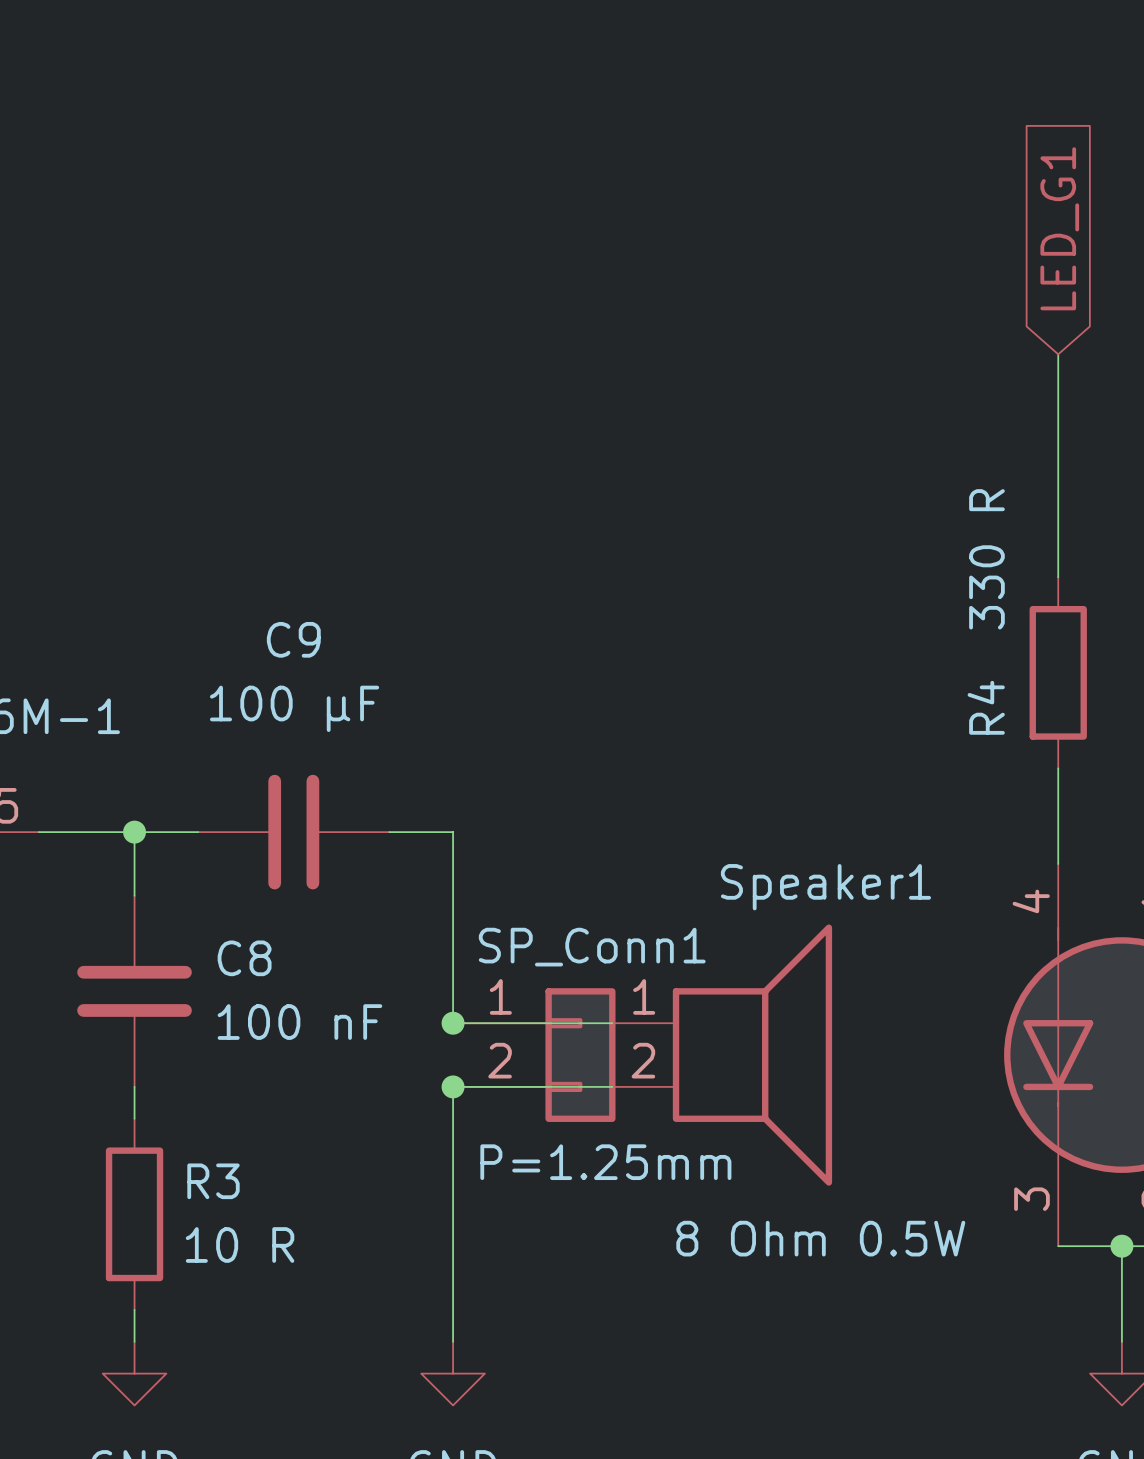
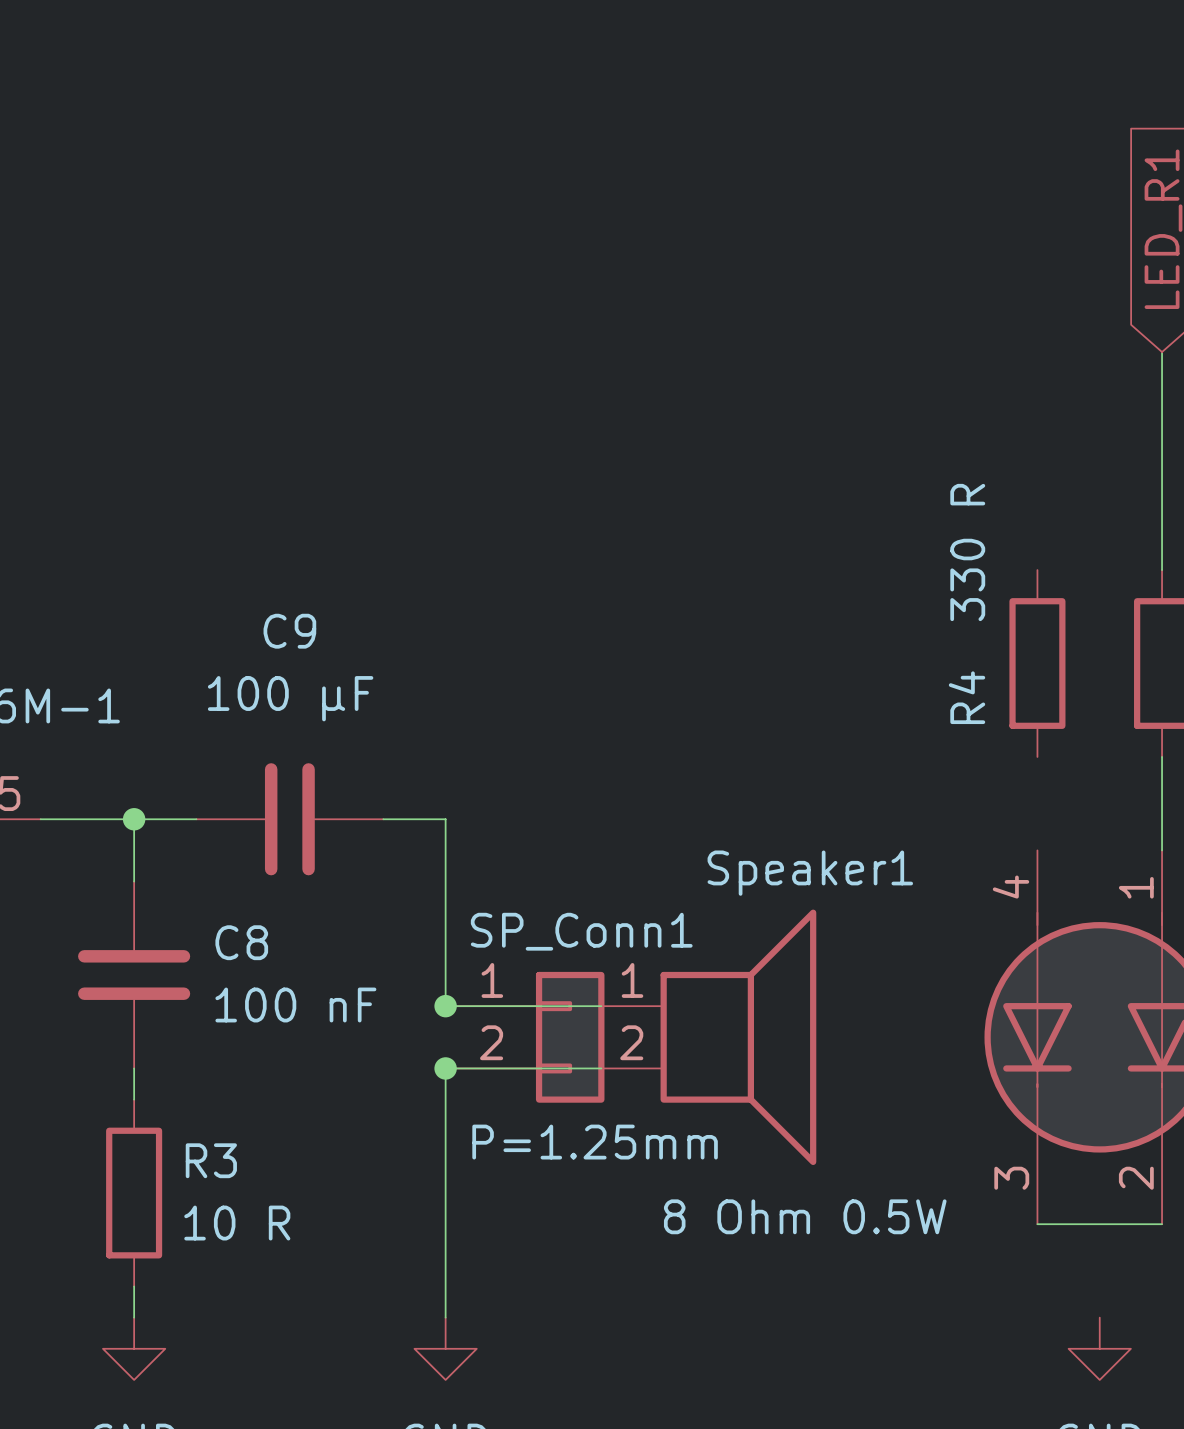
global label: LED_G1 (1059, 228) -> none
wire: (1058, 354) (1058, 577) -> none
wire: (1058, 768) (1058, 863) -> none
wire: (1121, 1246) (1121, 1341) -> none
junction: (1121, 1246) -> none

